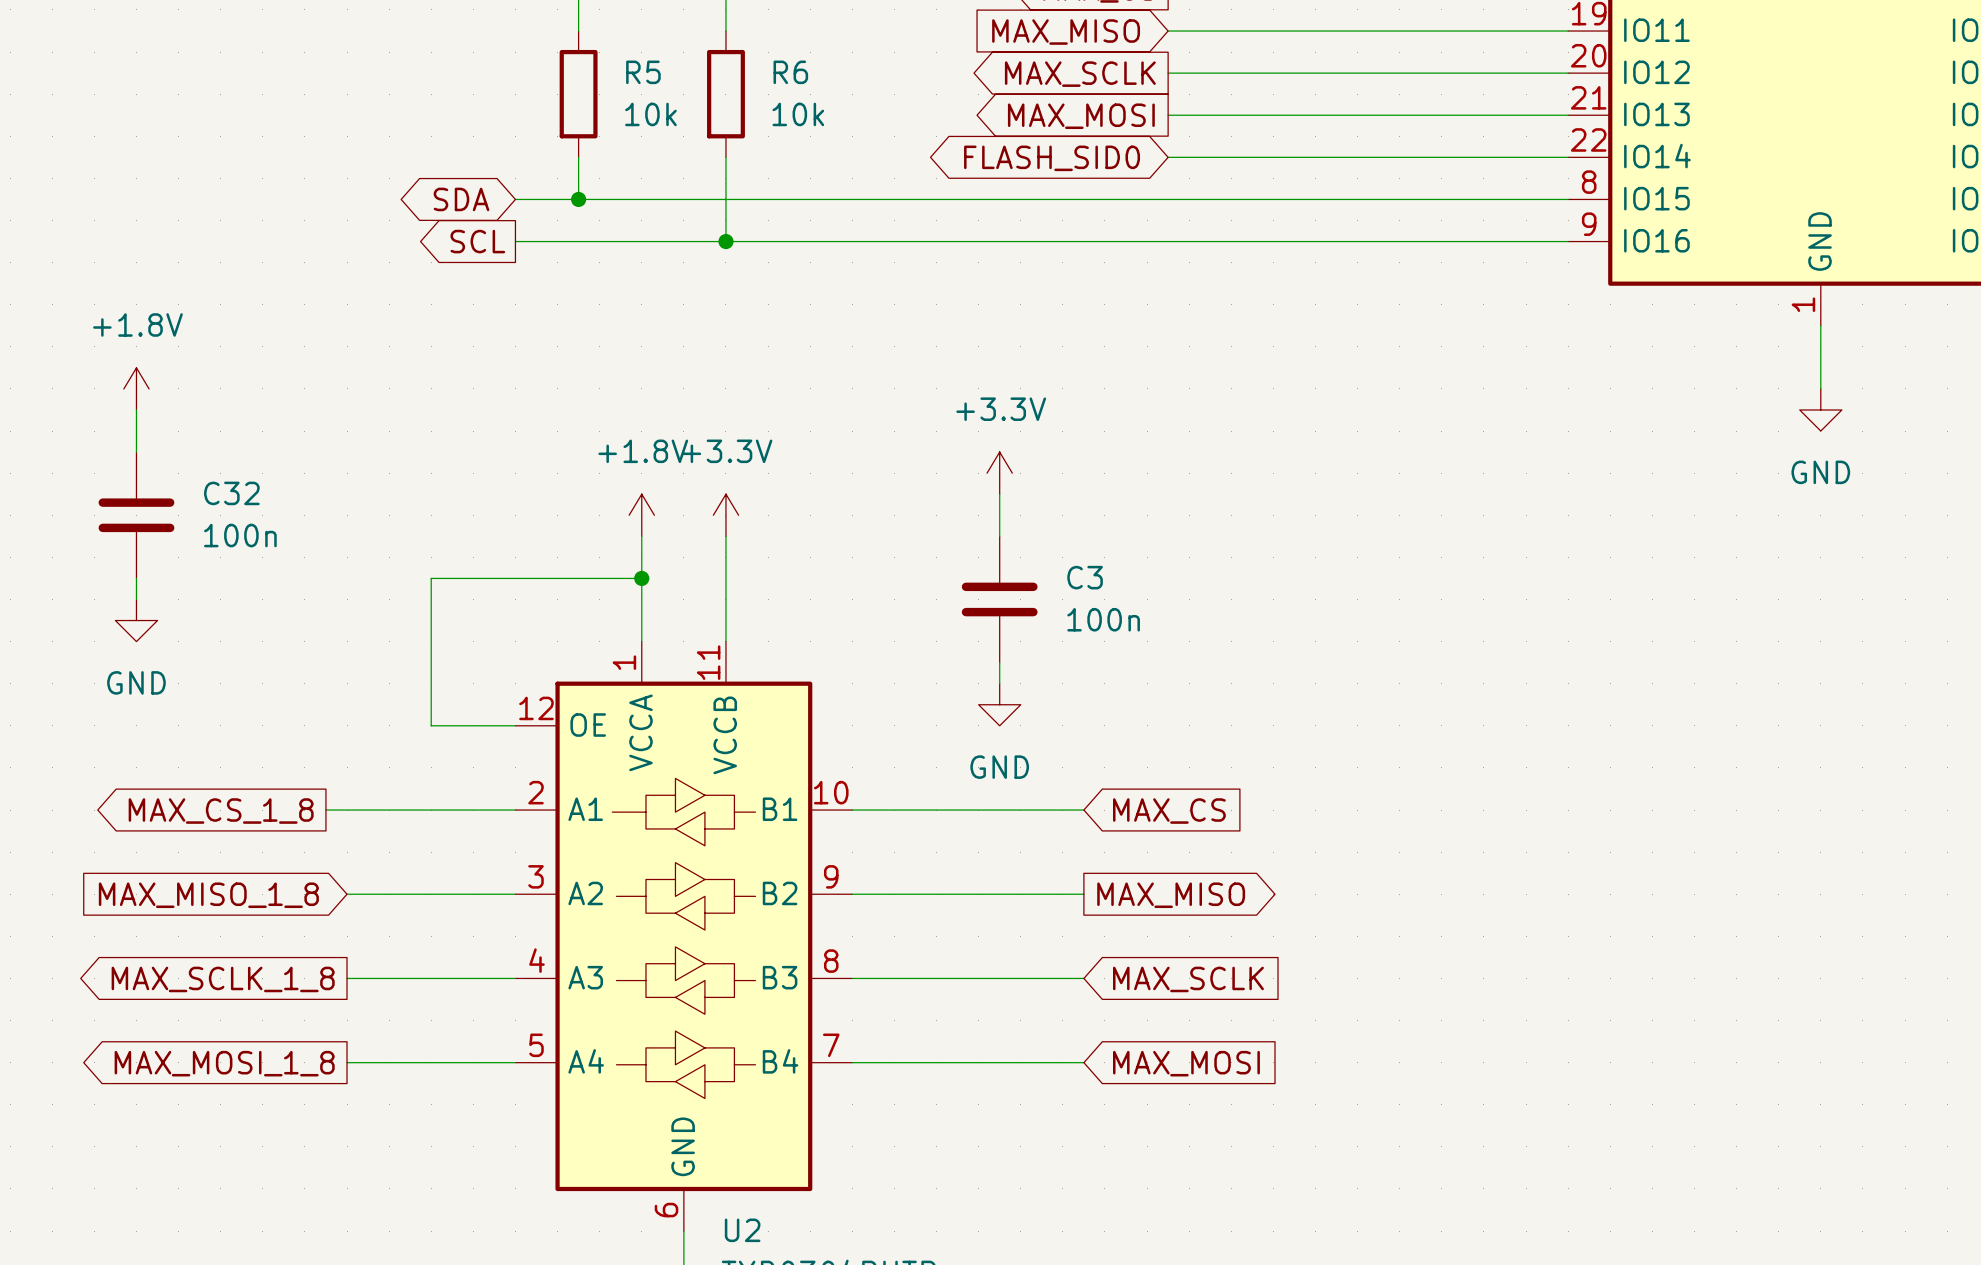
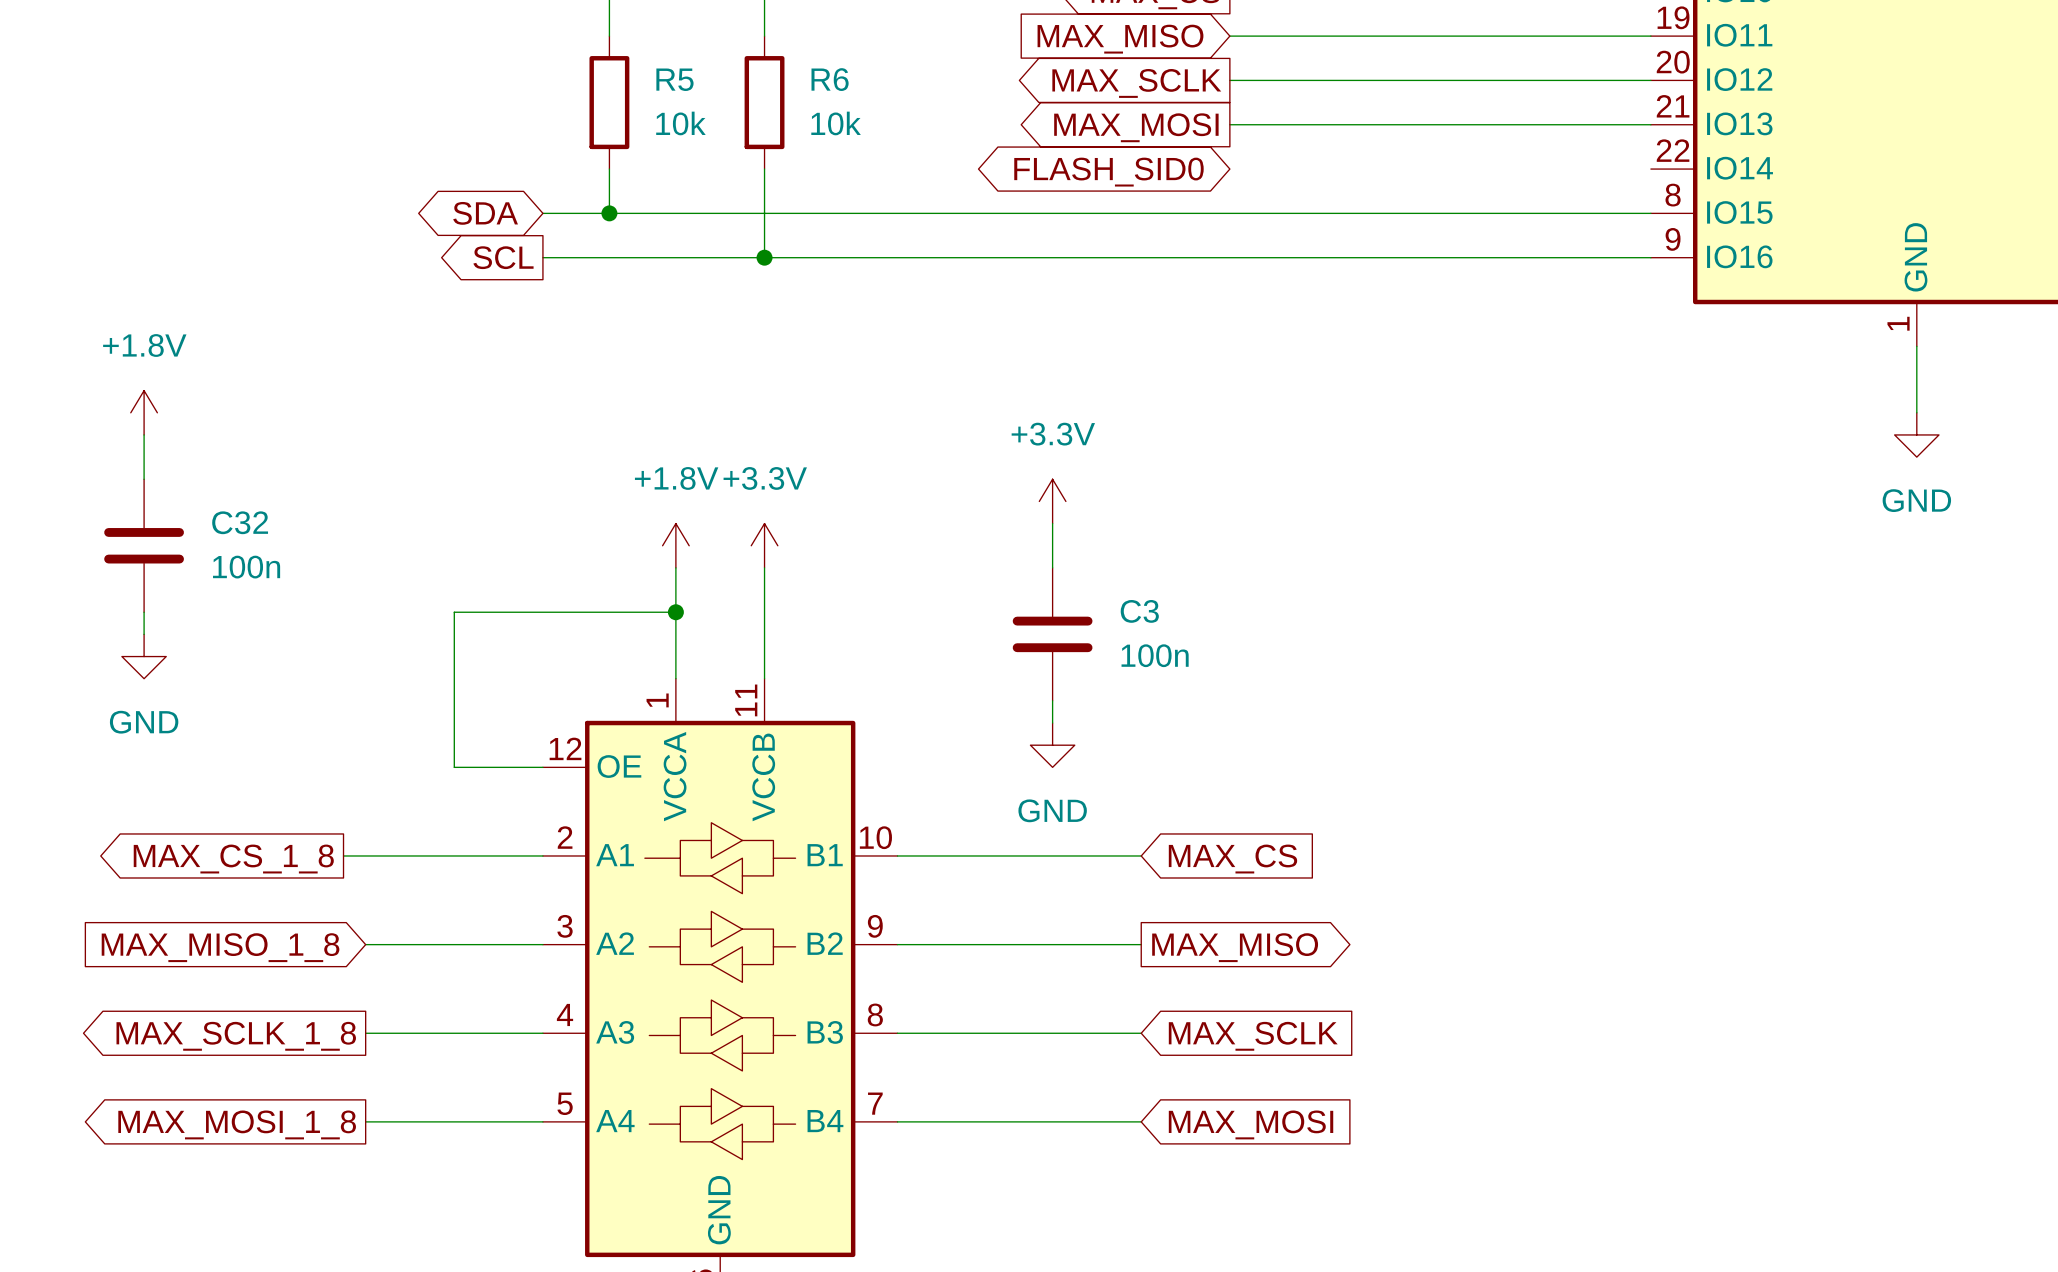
wire: (1168, 157) (1568, 157) -> none

